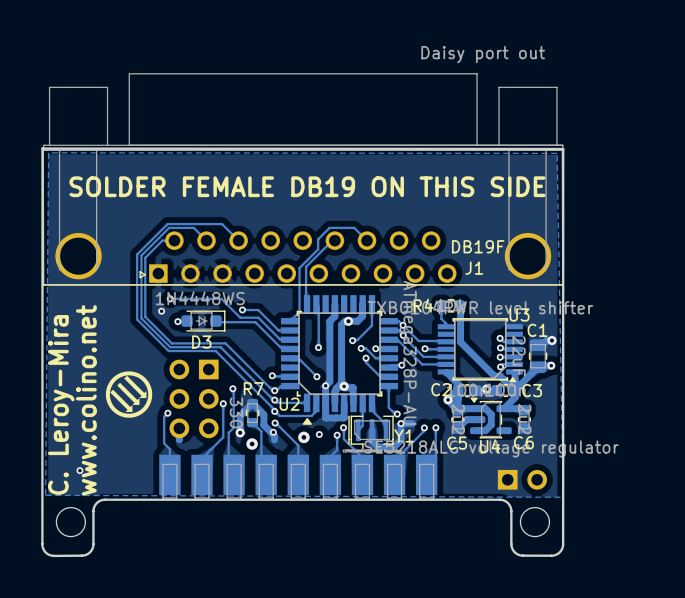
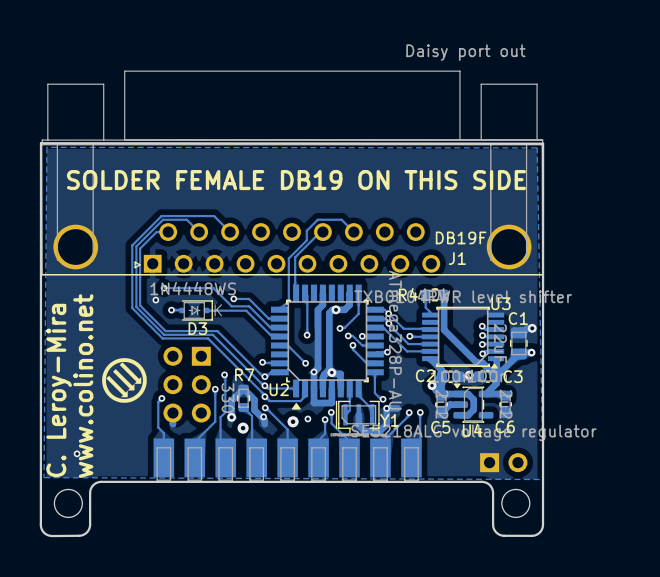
D3 footprint: [181, 310, 226, 332] -> [179, 300, 213, 321]

